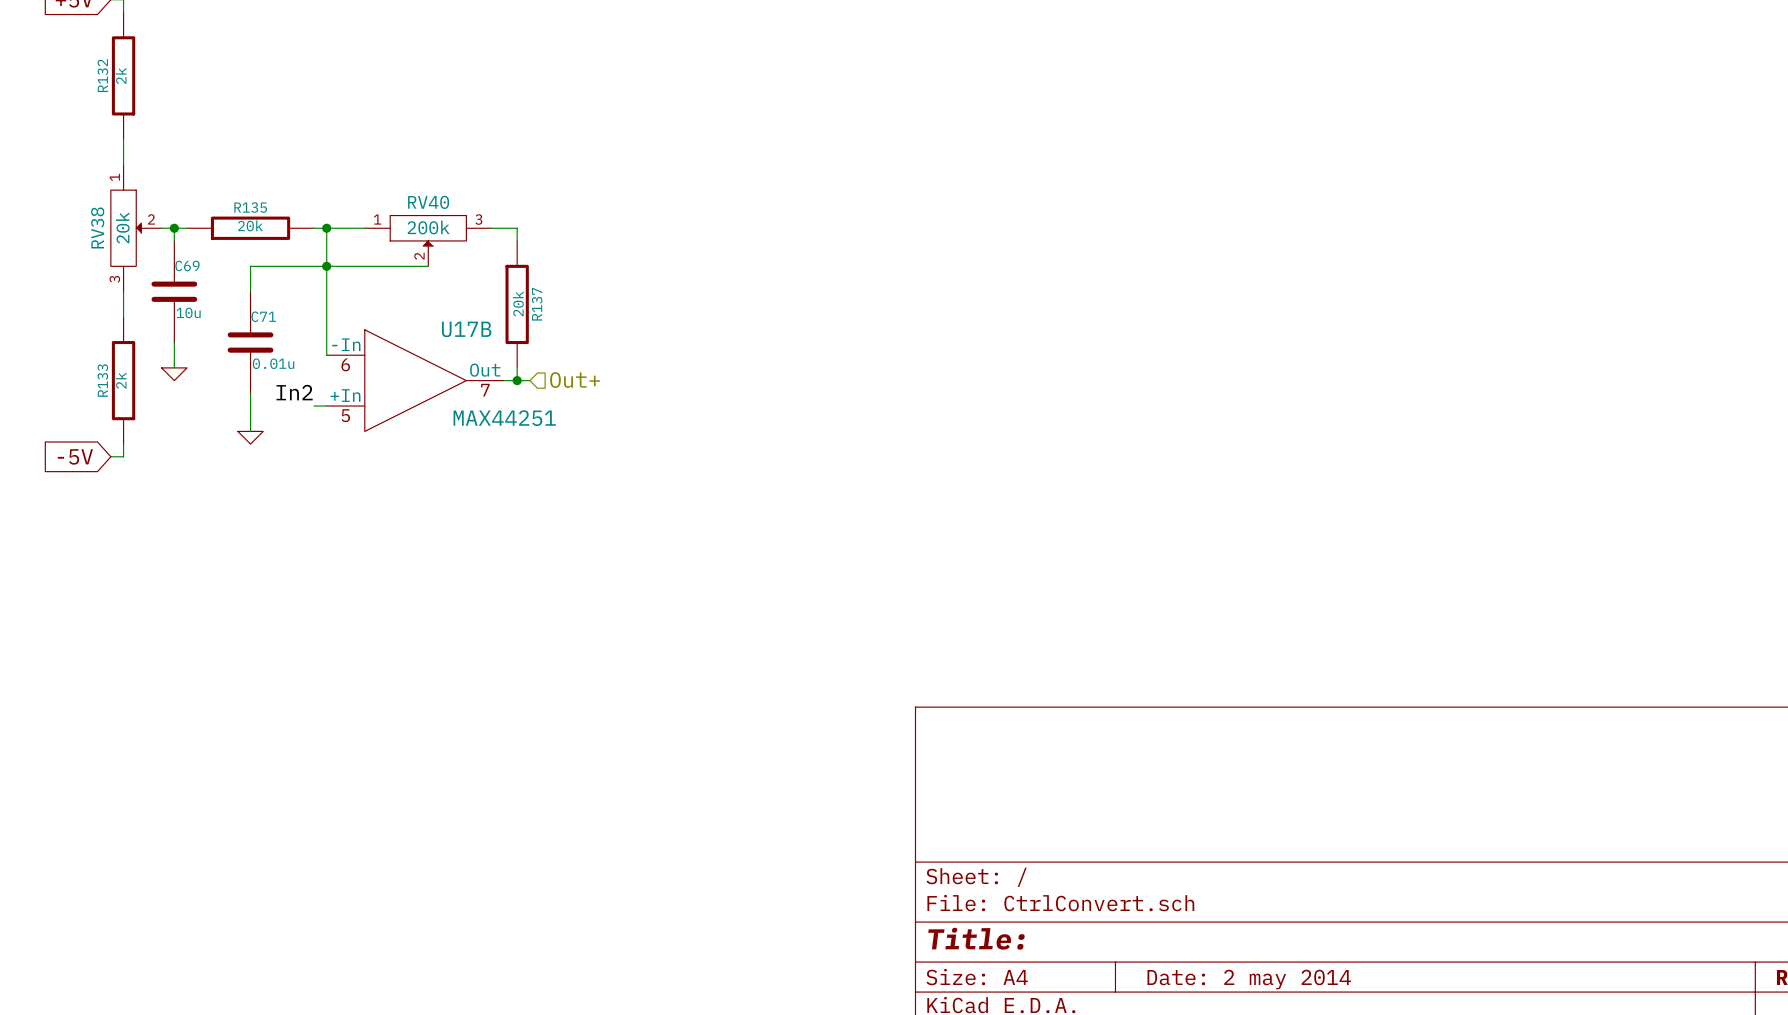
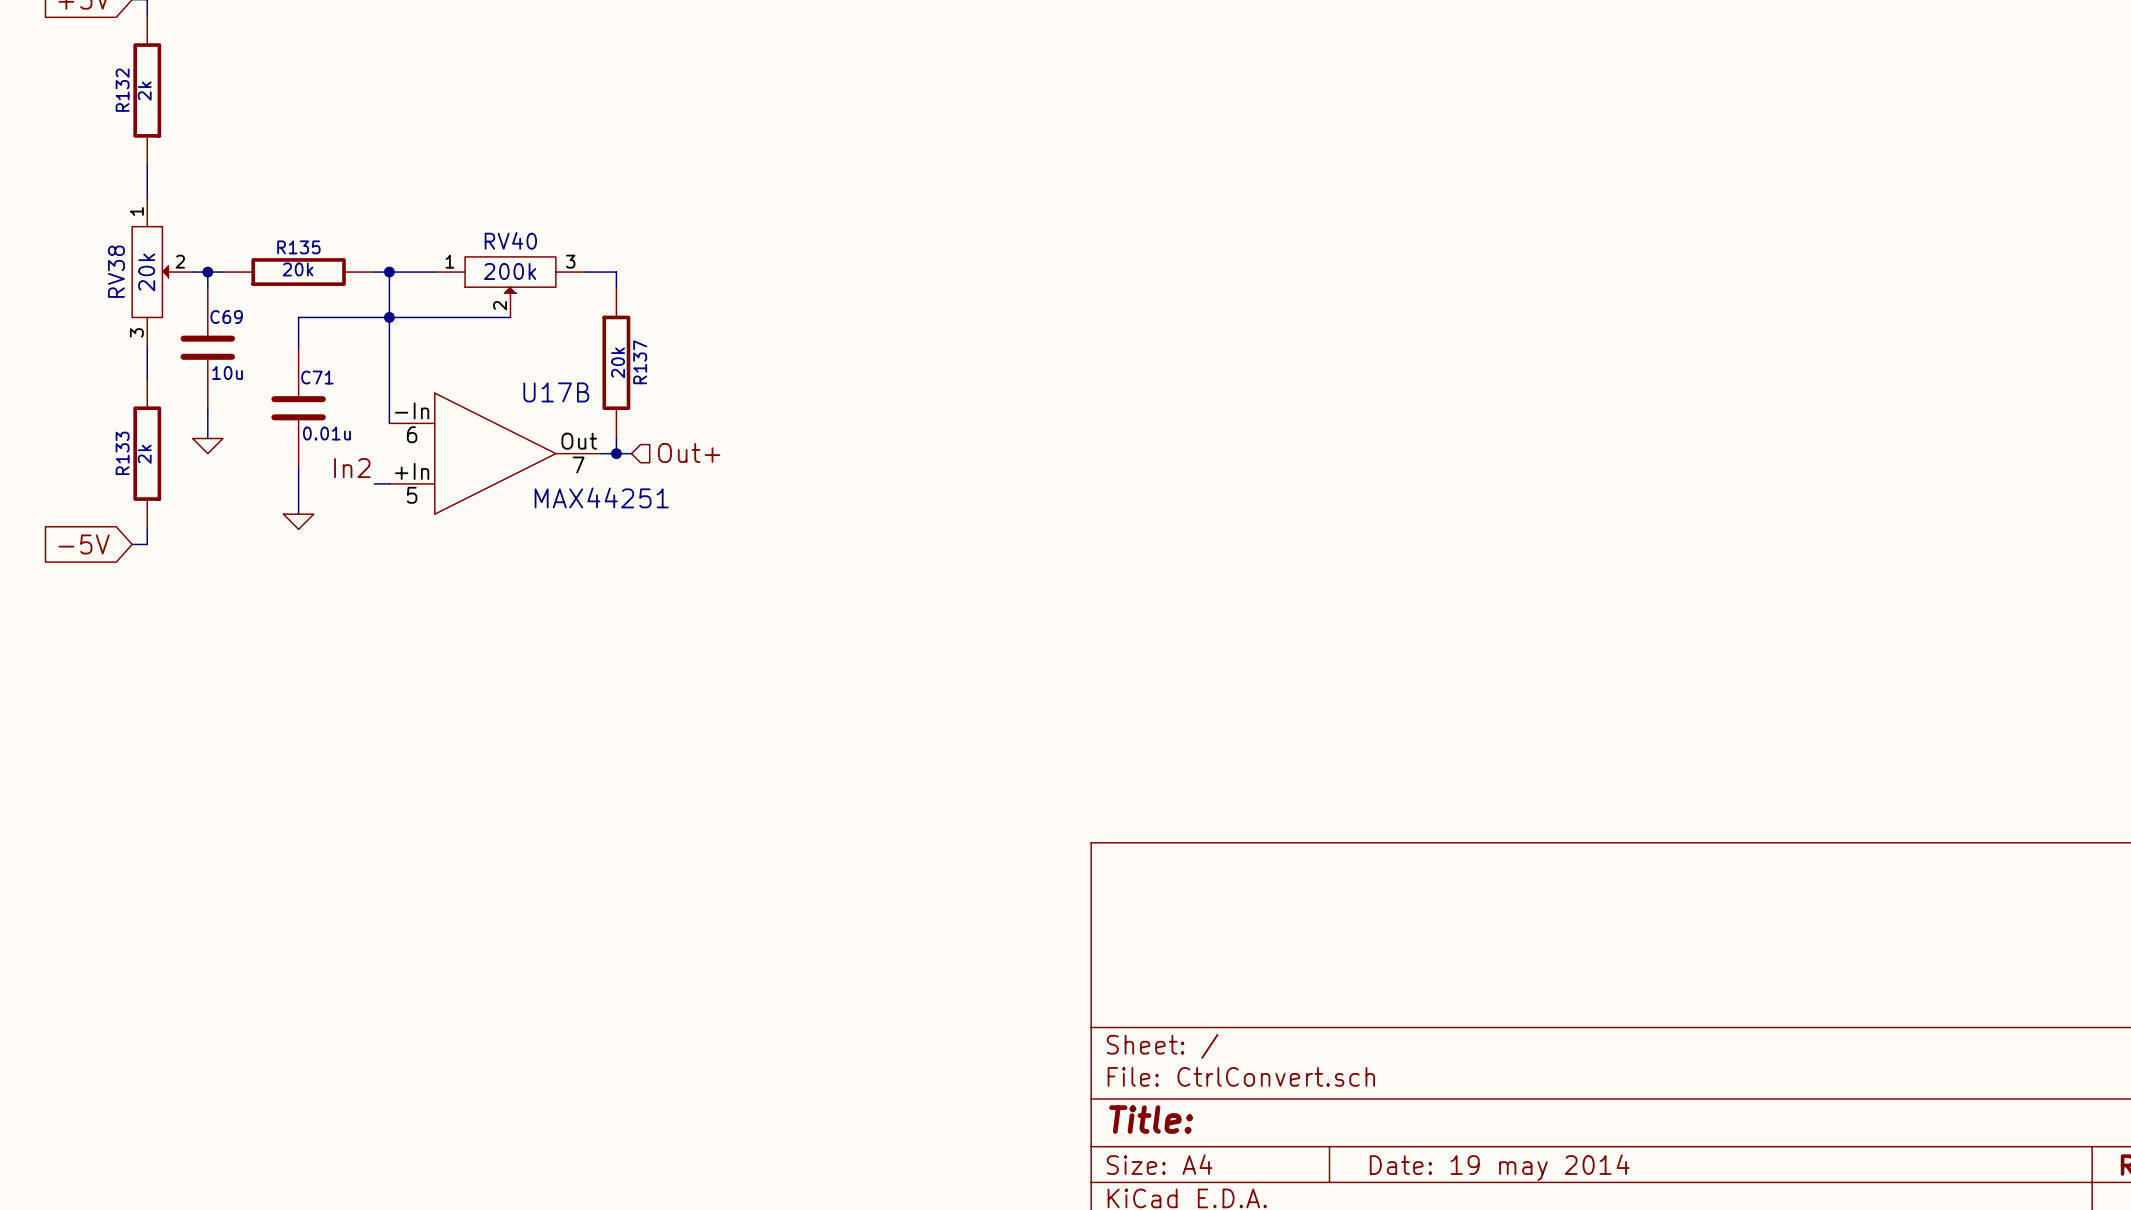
title block: Date: 2 may 2014 (1249, 979) -> Date: 19 may 2014 (1499, 1167)

